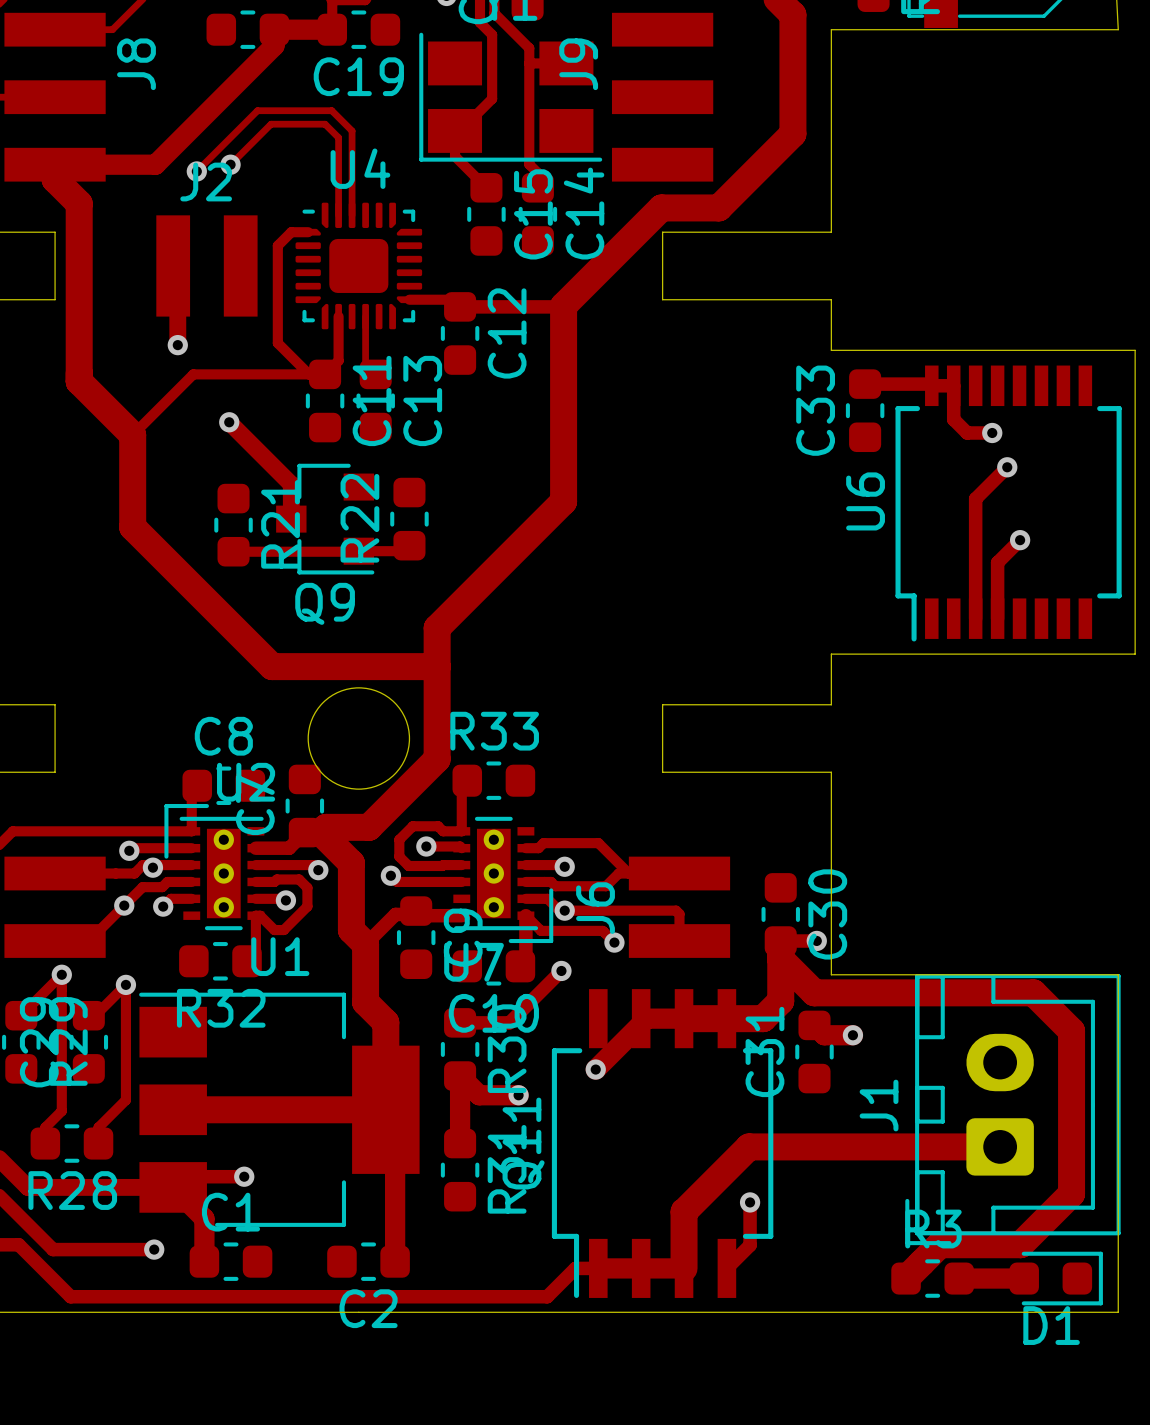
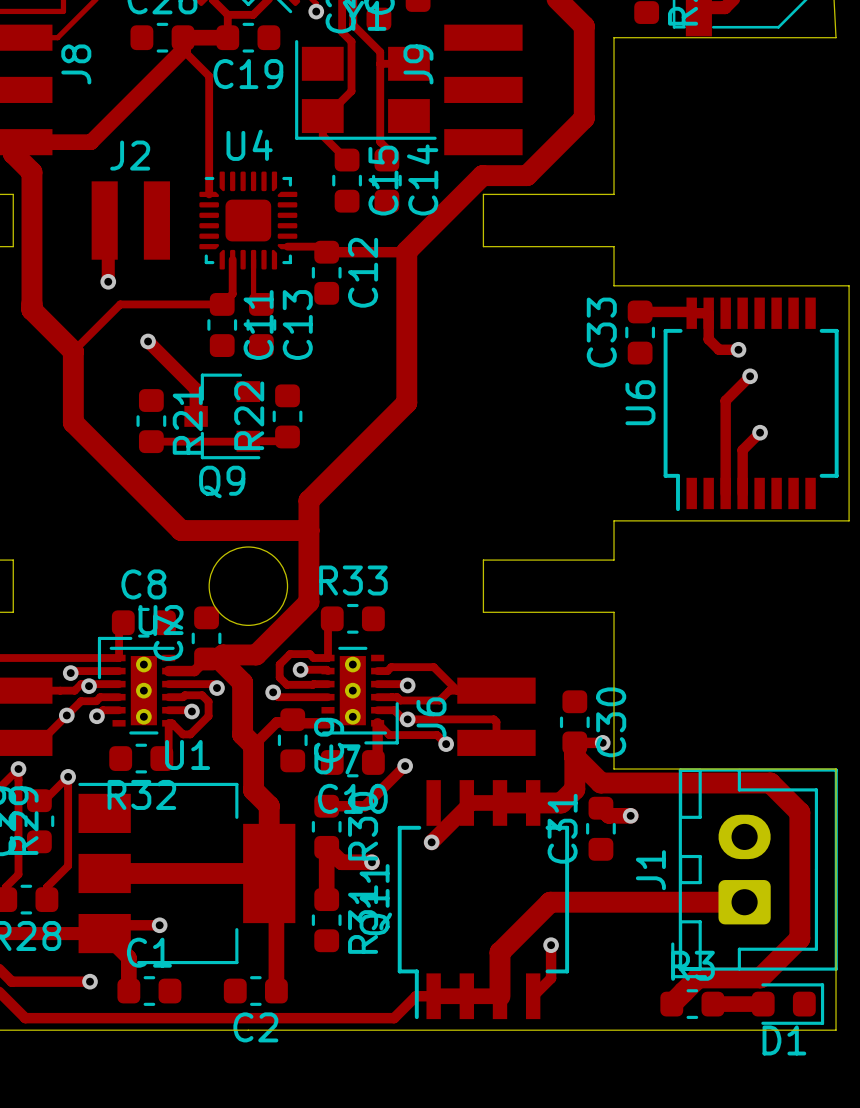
track: (230, 164) (271, 124) (325, 124) (338, 137) (338, 215) -> none
via: (230, 164) -> none
track: (196, 171) (257, 110) (331, 110) (352, 130) (352, 215) -> none
via: (196, 171) -> none
track: (308, 232) (291, 232) (277, 245) (277, 343) (309, 374) -> (209, 194) (209, 76) (183, 50)

